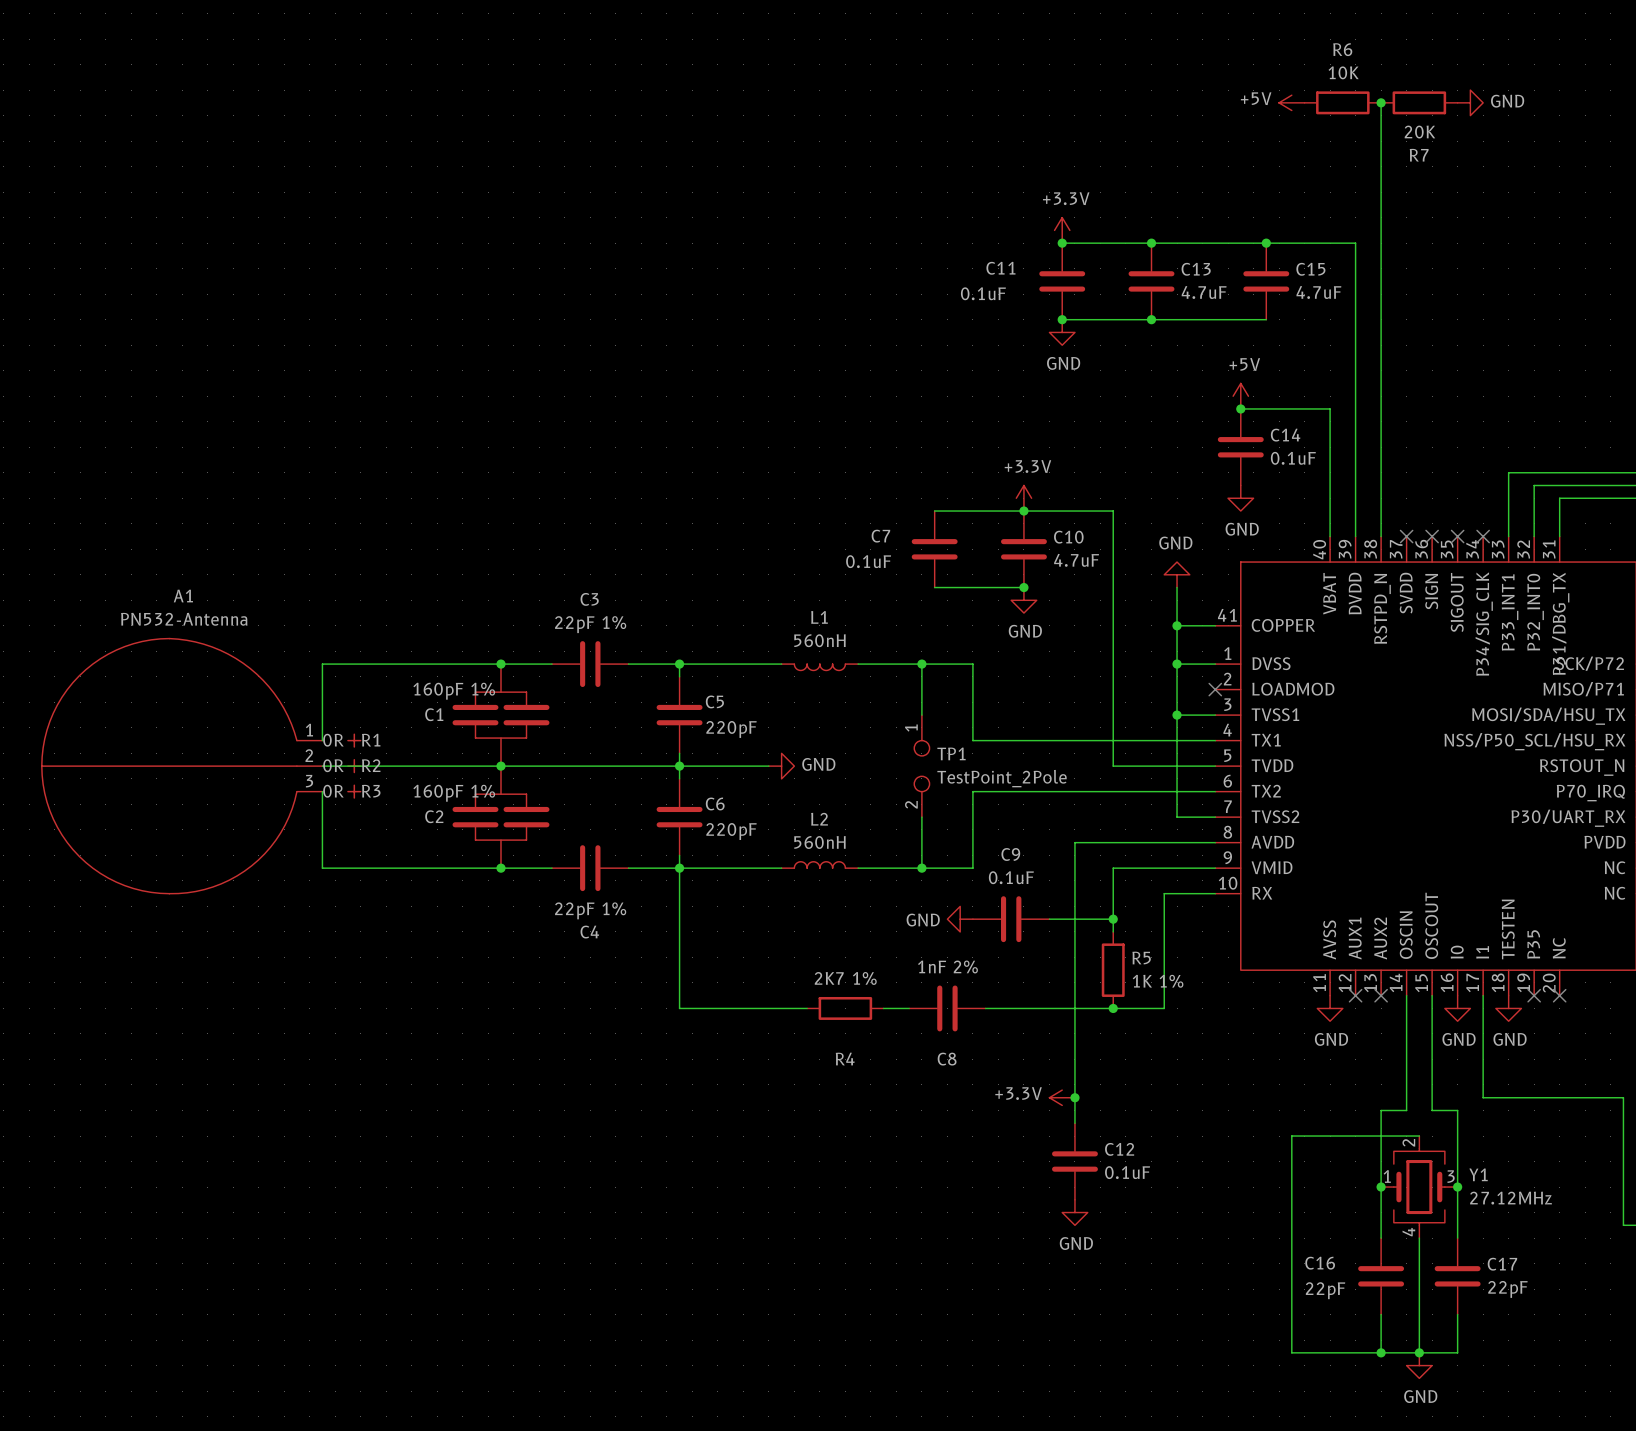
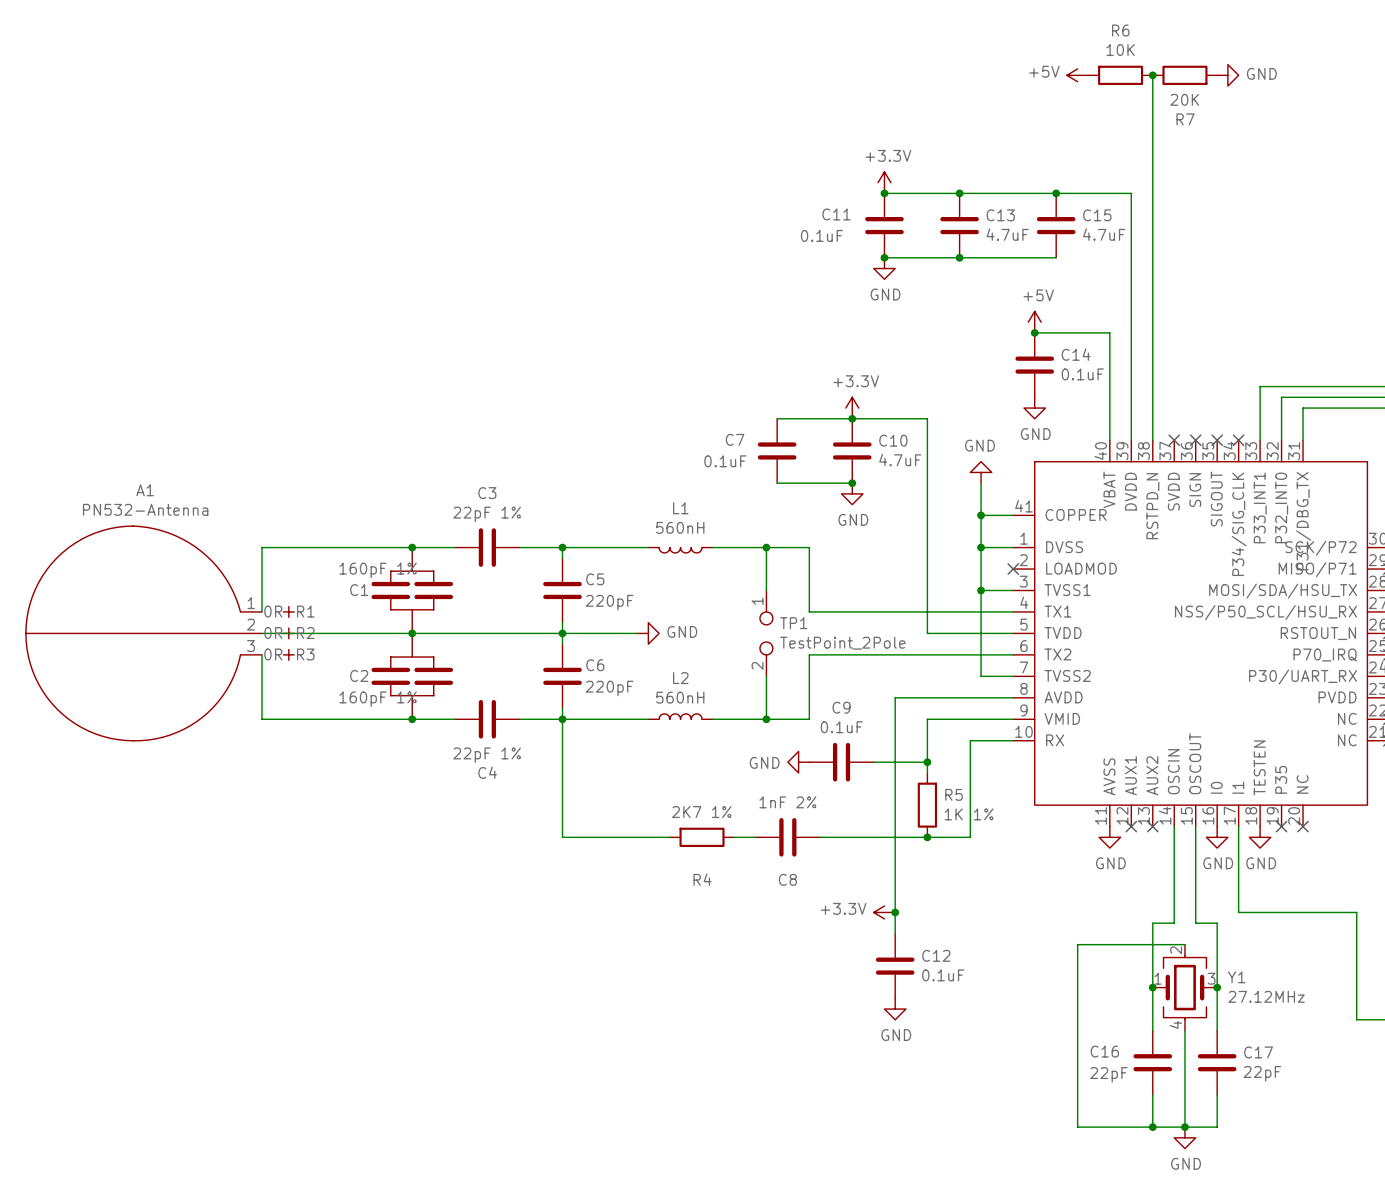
C2 value position: 160pF 1% (454, 793) -> 160pF 1% (378, 699)

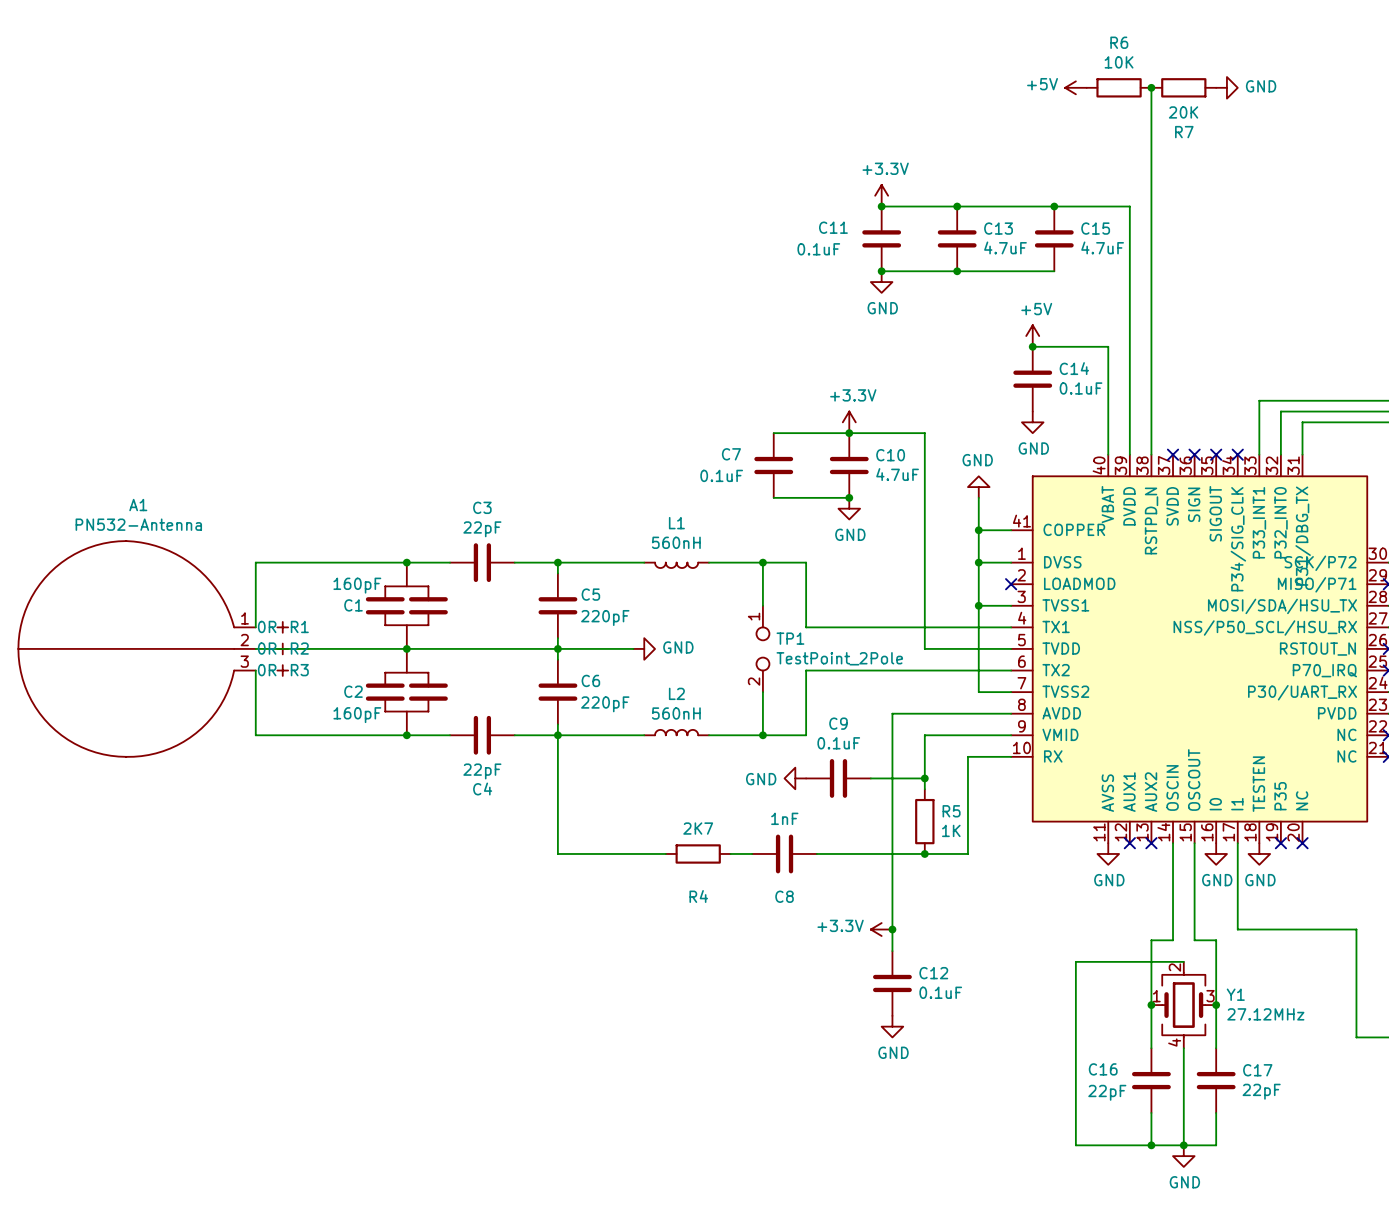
C3 value: 22pF 1% (487, 514) -> 22pF (482, 529)
C1 value: 160pF 1% (378, 570) -> 160pF (357, 585)
C2 value: 160pF 1% (378, 699) -> 160pF (357, 715)
C4 value: 22pF 1% (487, 755) -> 22pF (482, 771)
C8 value: 1nF 2% (787, 802) -> 1nF (784, 818)
R4 value: 2K7 1% (701, 812) -> 2K7 (698, 828)
R5 value: 1K 1% (969, 814) -> 1K (951, 830)

